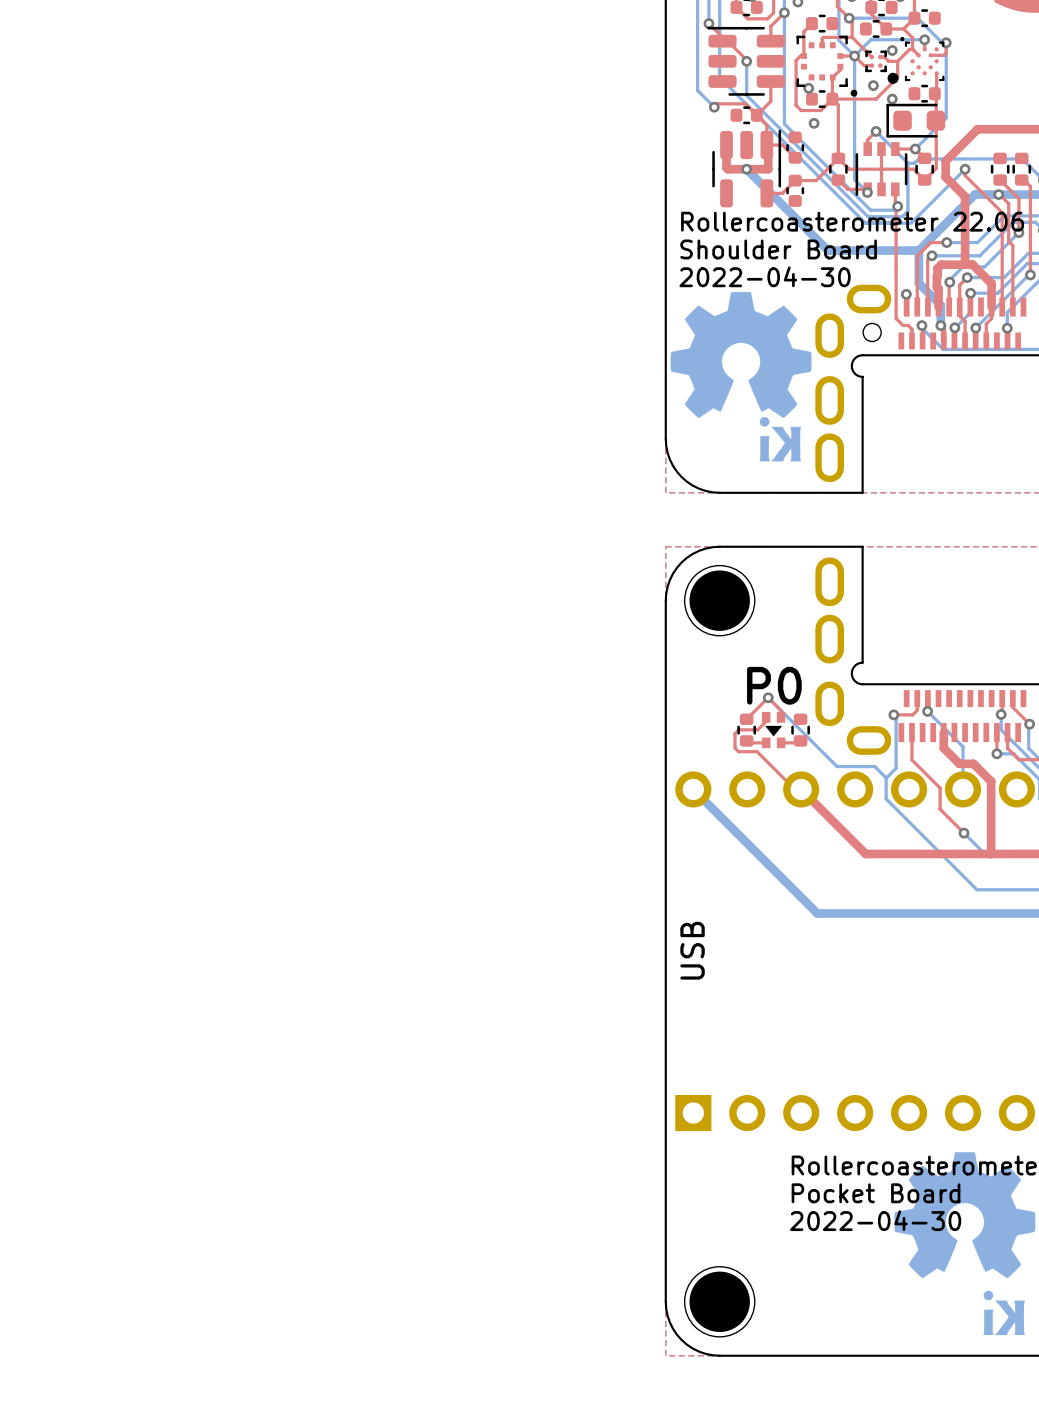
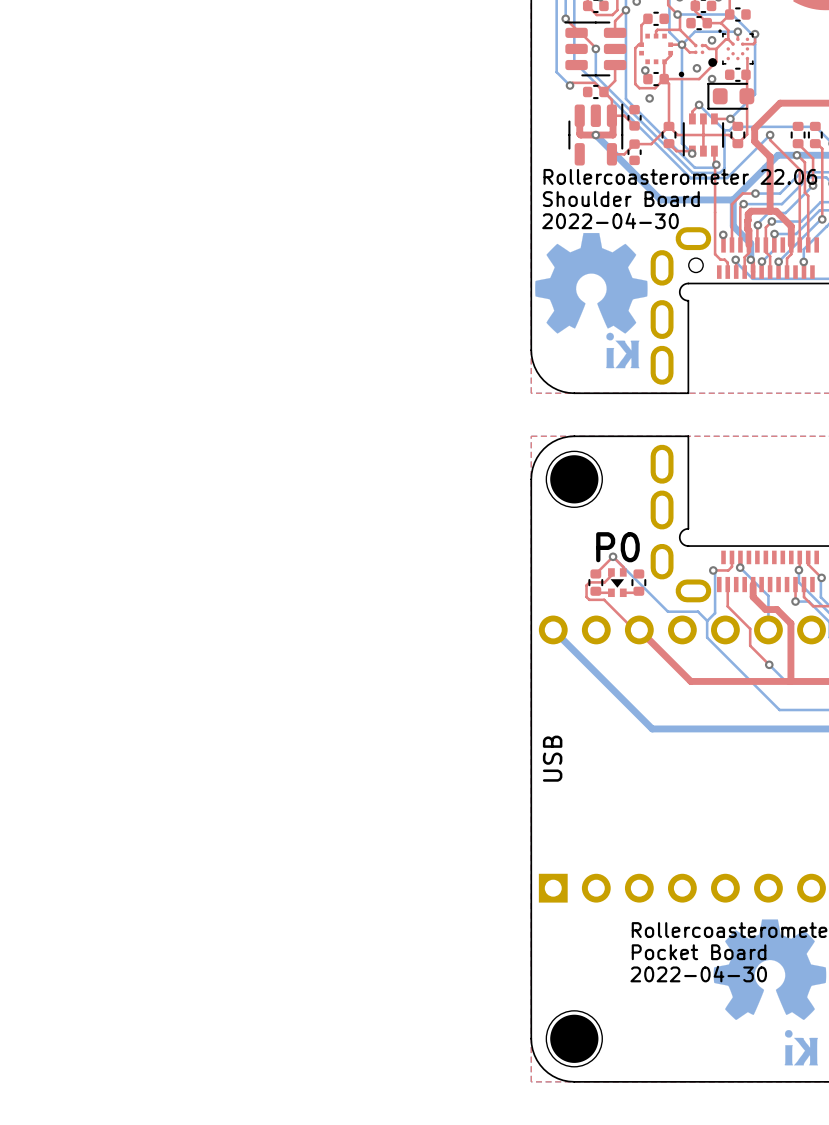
part footprint: [796, 35, 858, 97] -> [639, 33, 685, 78]
part footprint: [865, 50, 899, 84] -> [693, 43, 718, 67]
top track: none -> (748, 244) (748, 253) (744, 257) (744, 272)

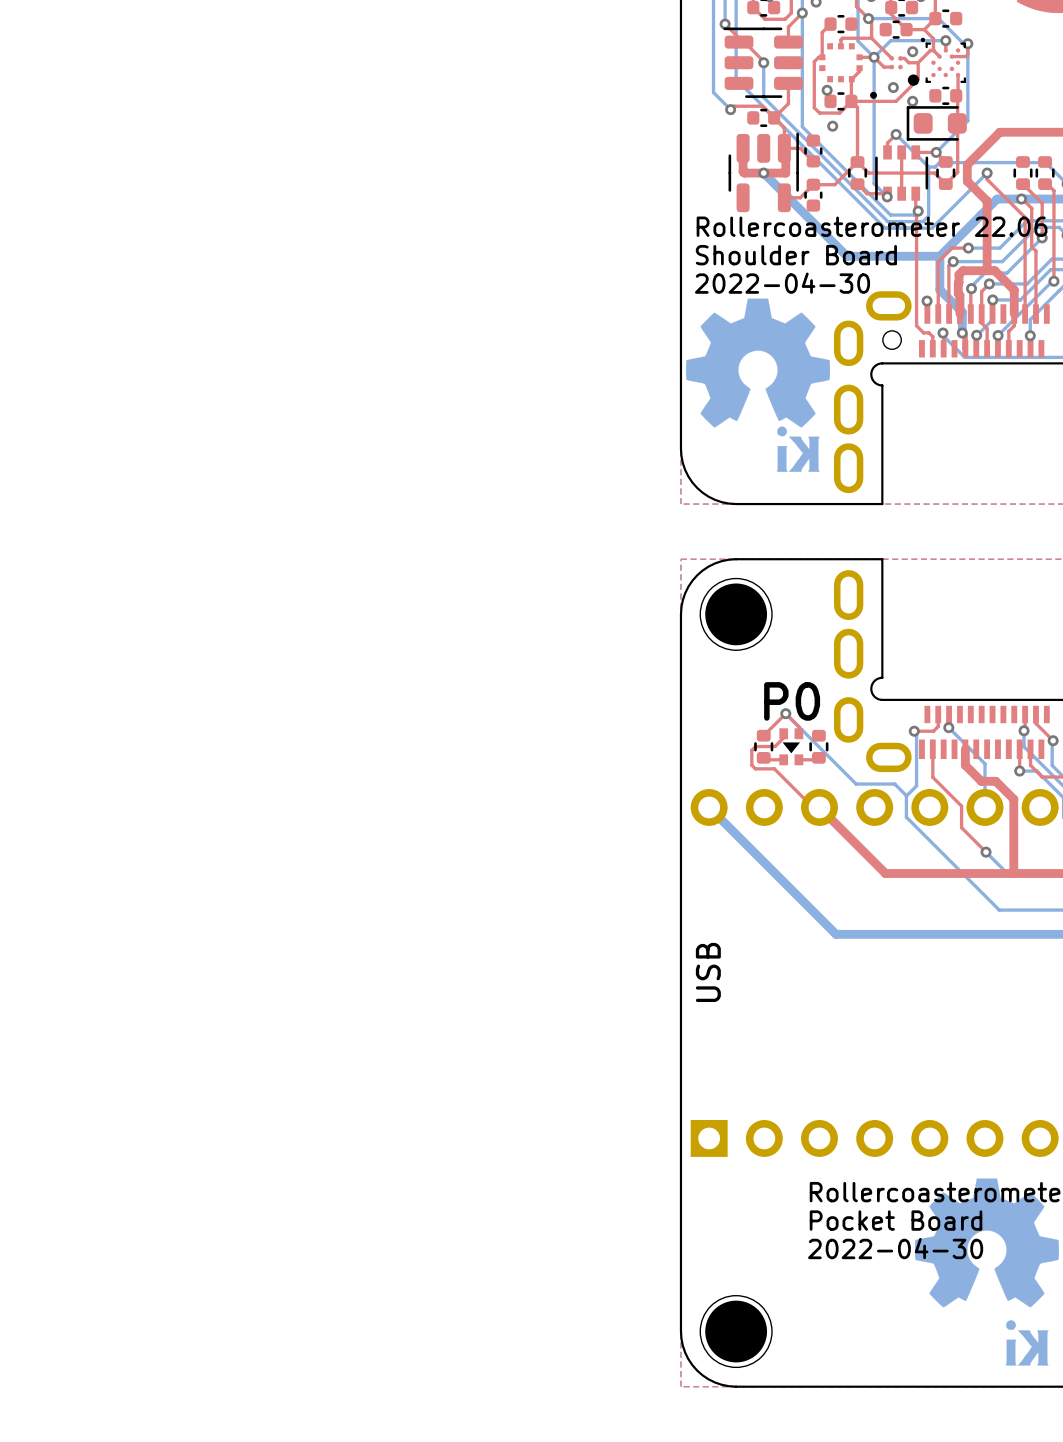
top track: (748, 244) (748, 253) (744, 257) (744, 272) -> none

